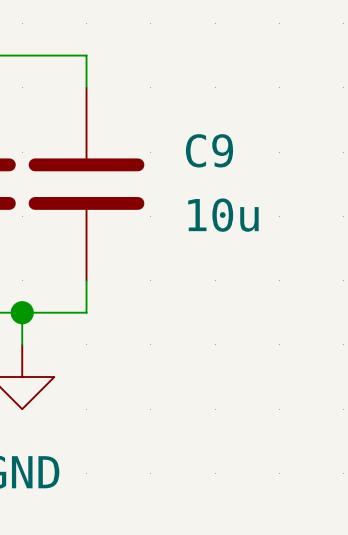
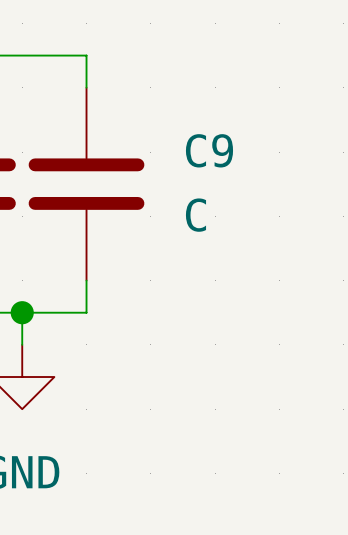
C9 value: 10u (223, 215) -> C (195, 215)

